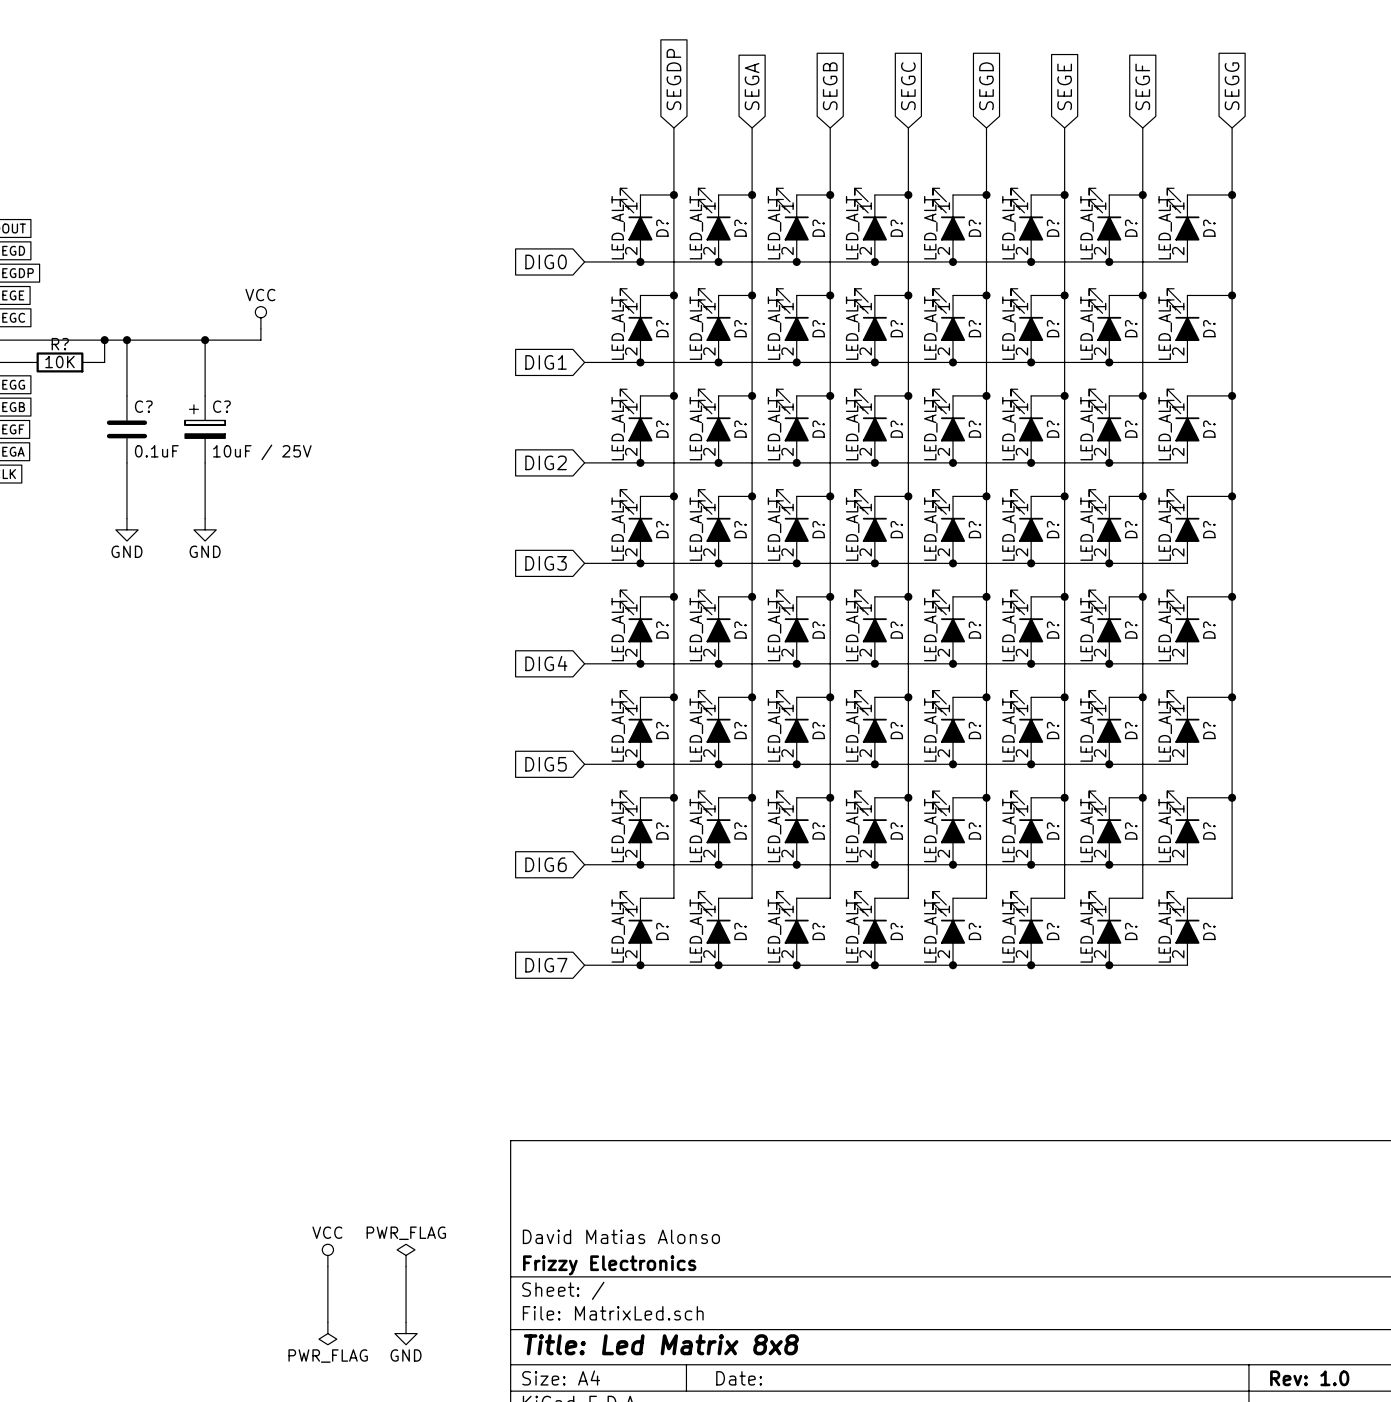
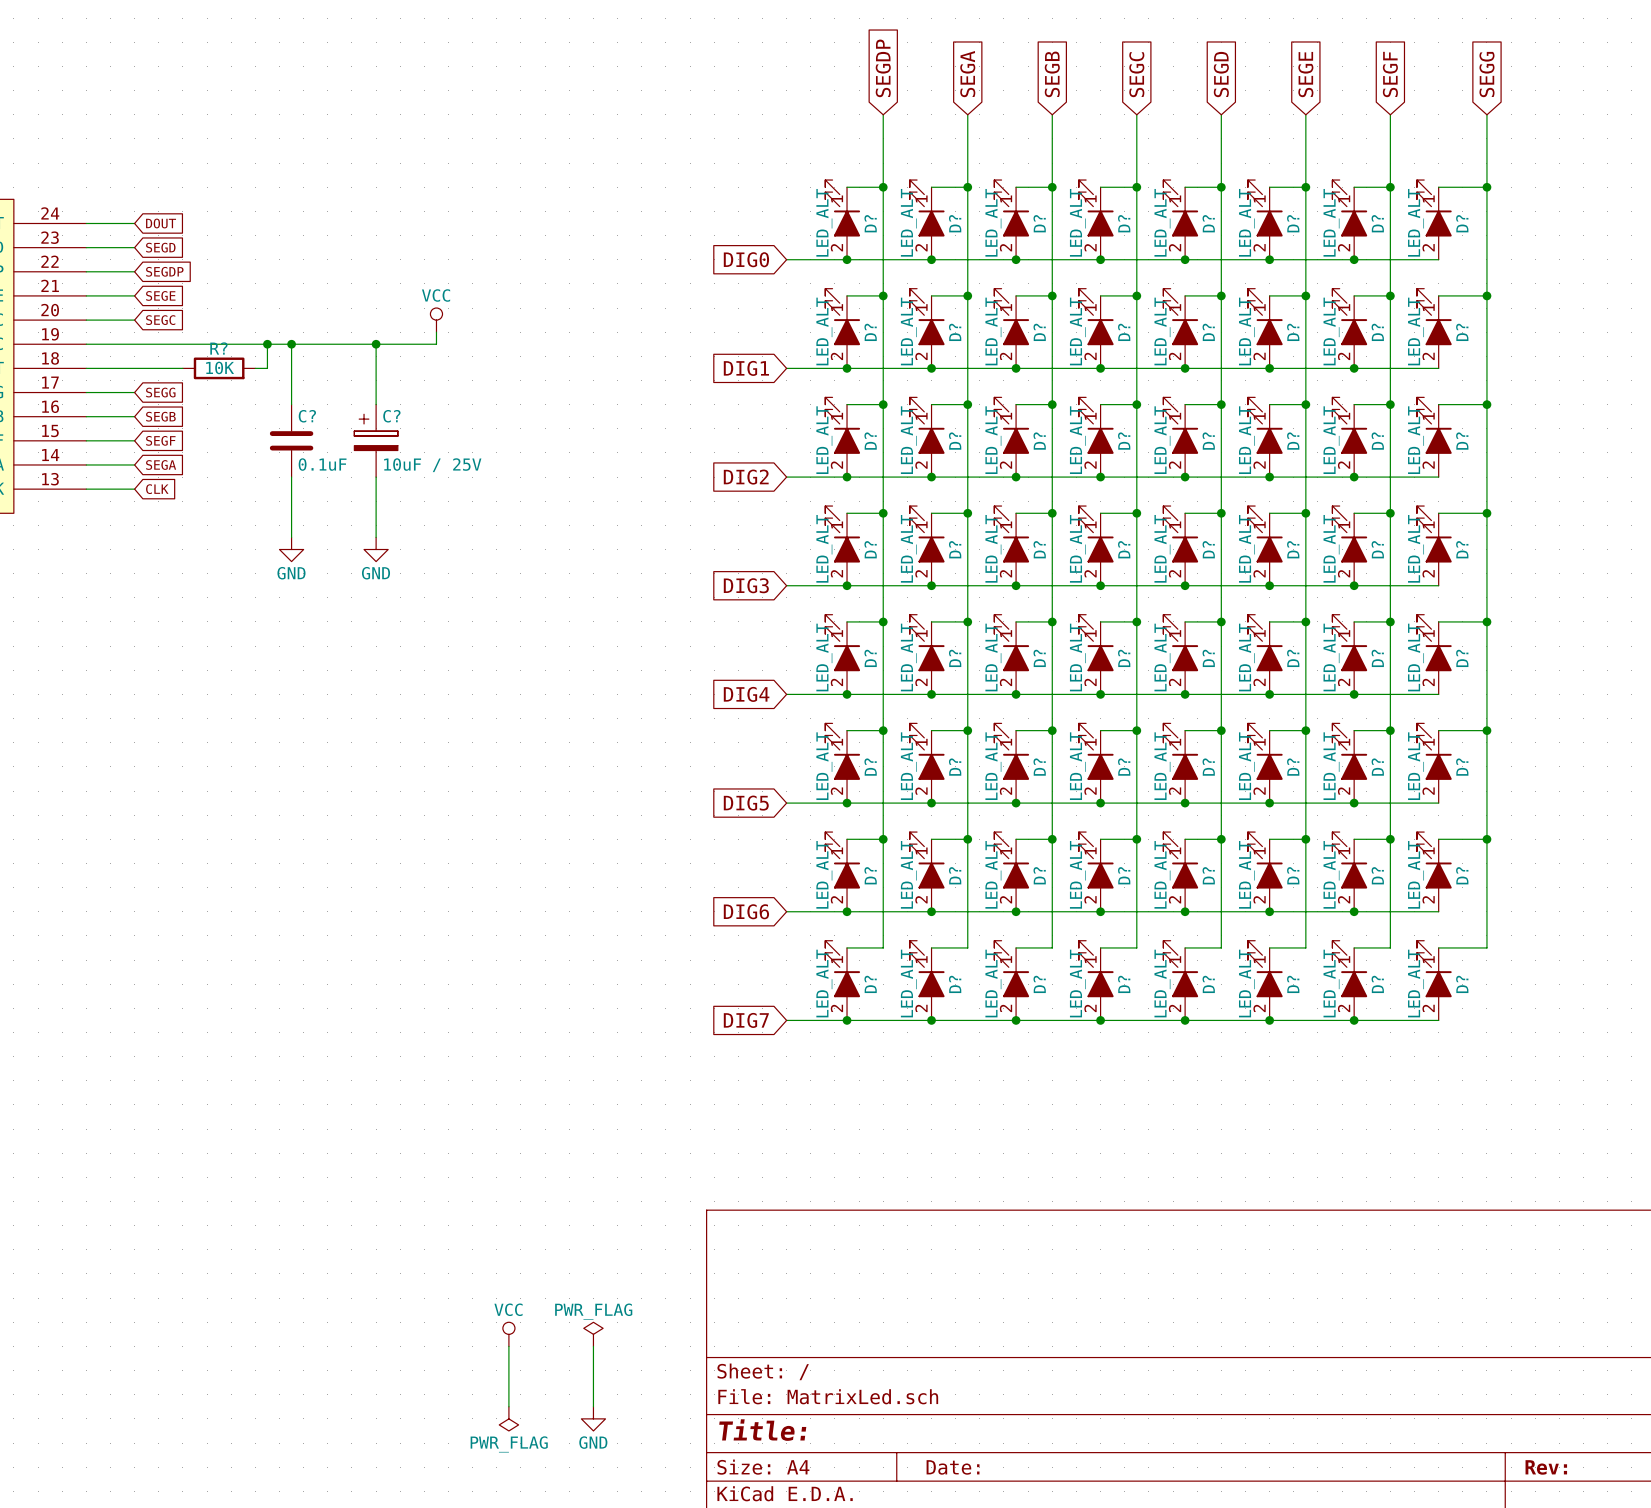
title block: David Matias Alonso (621, 1236) -> none
title block: Frizzy Electronics (609, 1265) -> none
title block: Title: Led Matrix 8x8 (661, 1344) -> Title: (762, 1430)
title block: Rev: 1.0 (1309, 1378) -> Rev: (1546, 1467)

